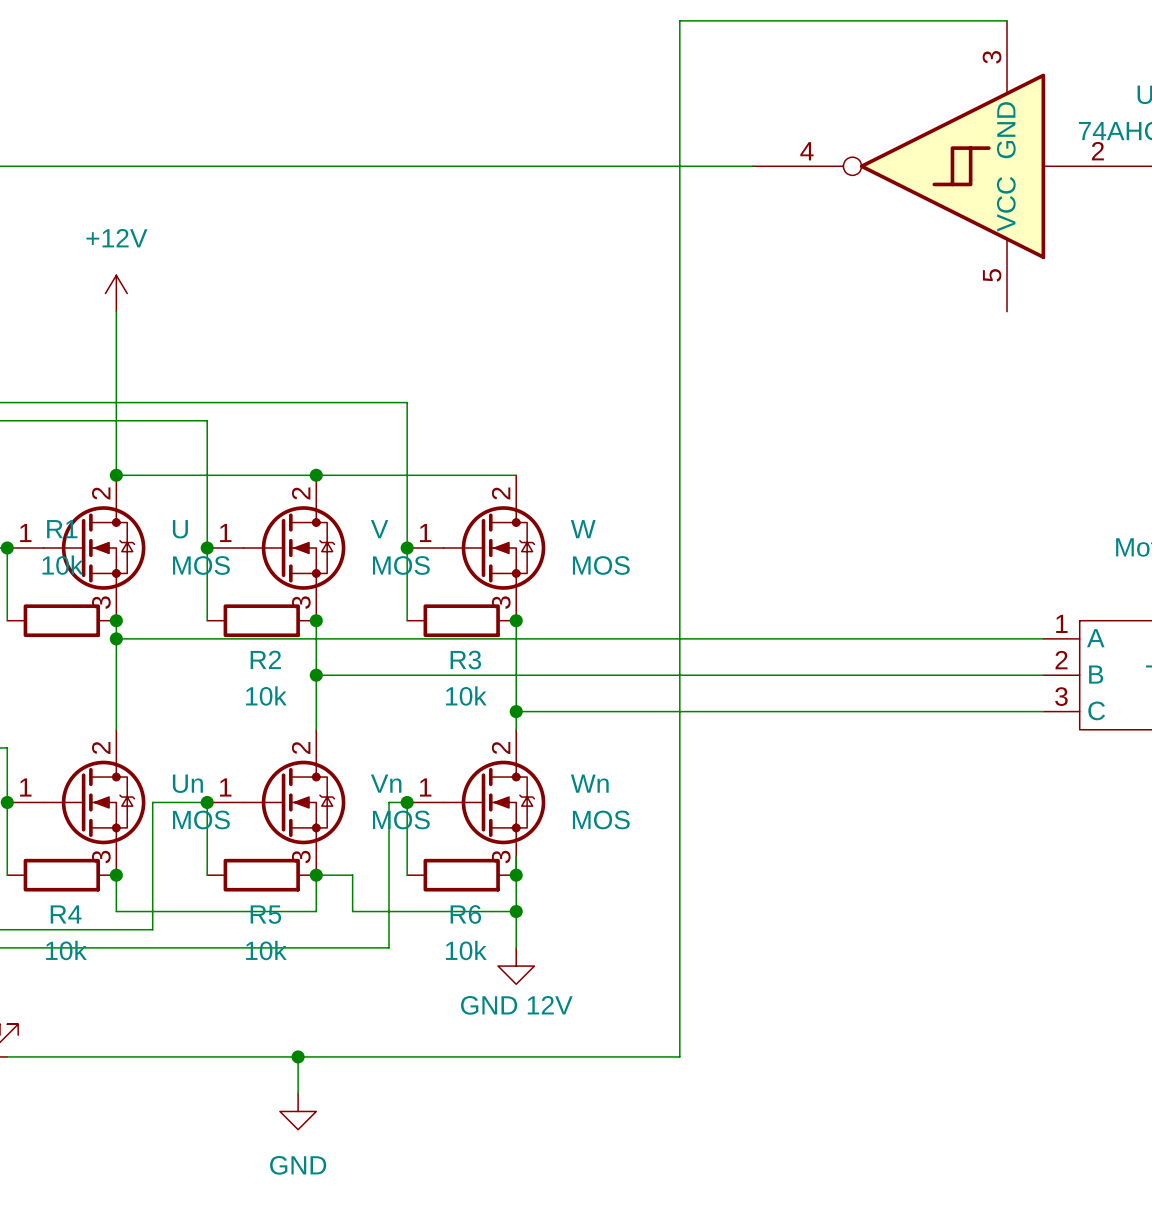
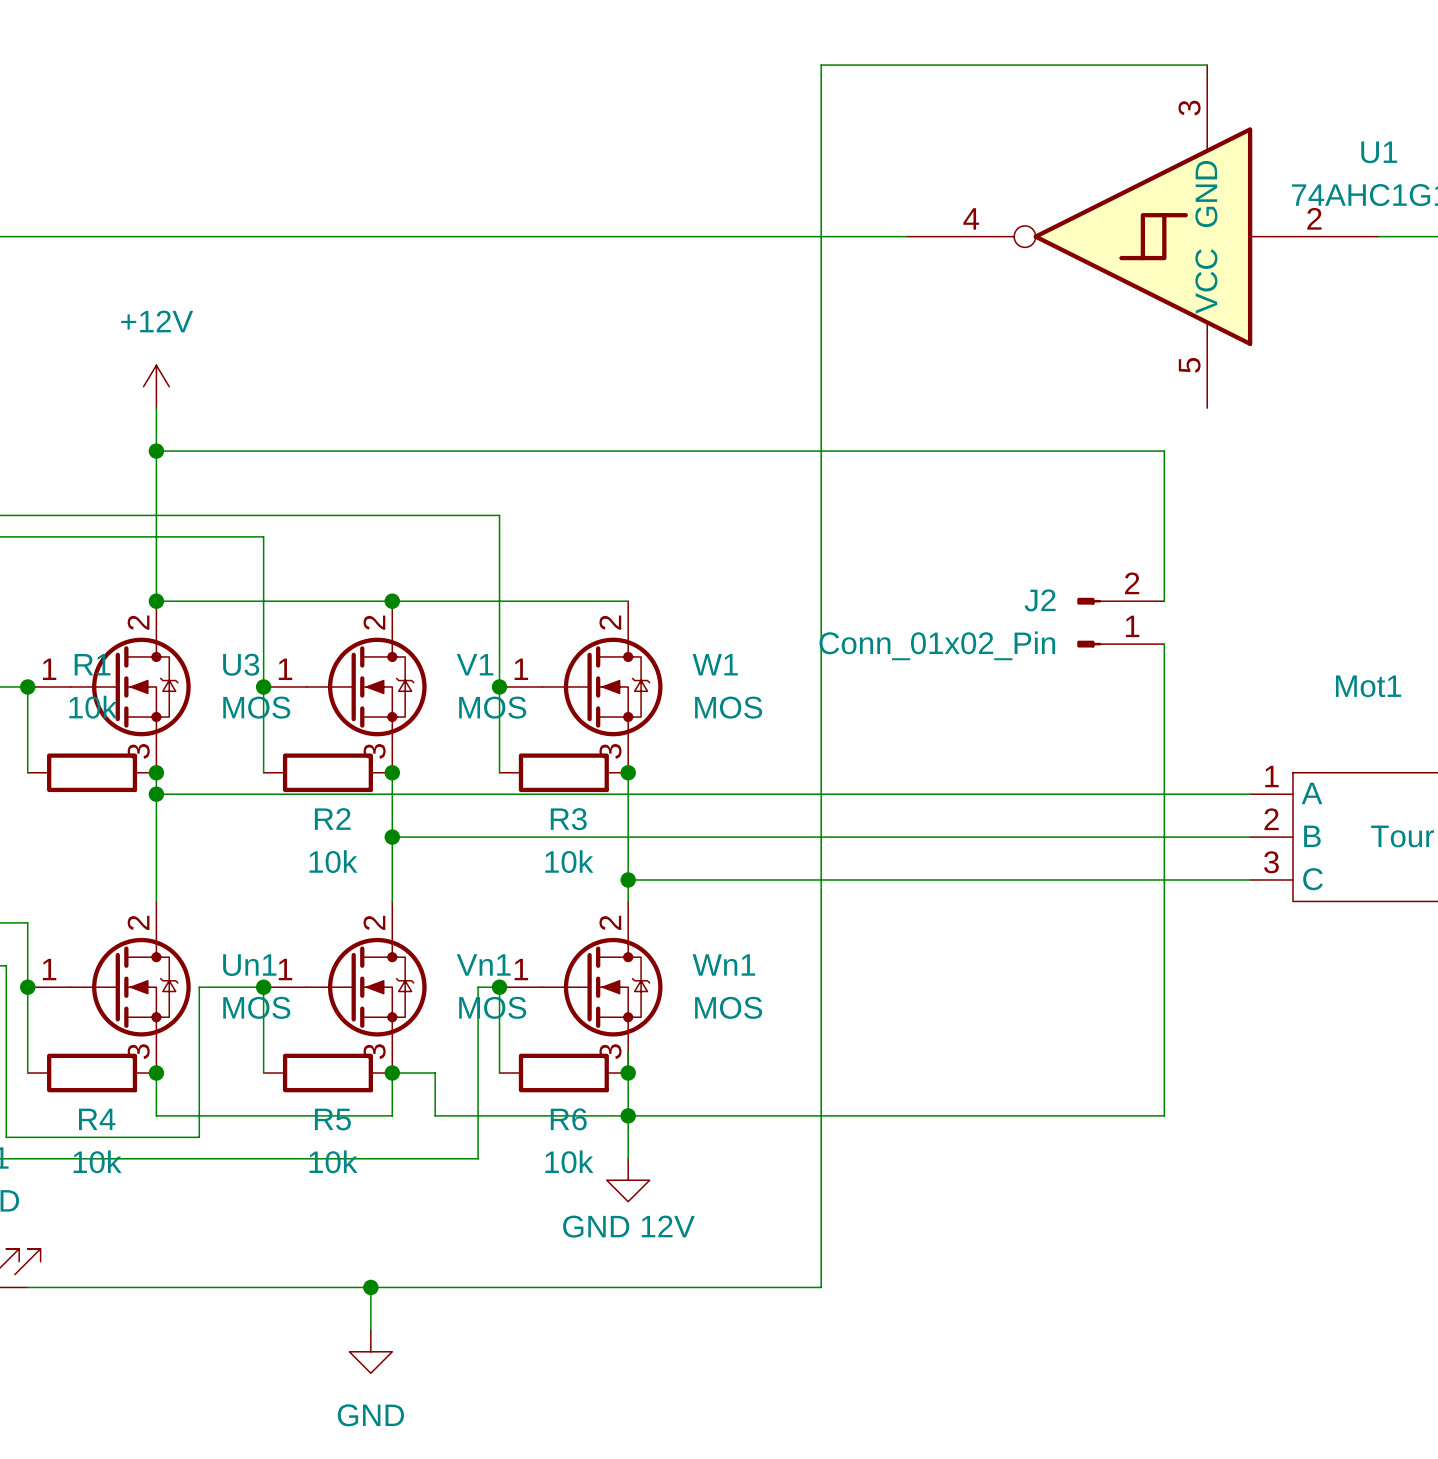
wire: none -> (156, 451) (1164, 451) (1164, 601)
junction: none -> (156, 451)
J2: none -> Conn_01x02_Pin (1120, 622)
wire: none -> (1164, 644) (1164, 1115) (628, 1115)
U name: U (180, 529) -> U3 (241, 664)
V name: V (379, 529) -> V1 (475, 664)
W name: W (583, 529) -> W1 (715, 664)
Un name: Un (187, 783) -> Un1 (249, 965)
Vn name: Vn (386, 783) -> Vn1 (483, 964)
Wn name: Wn (589, 783) -> Wn1 (723, 964)

